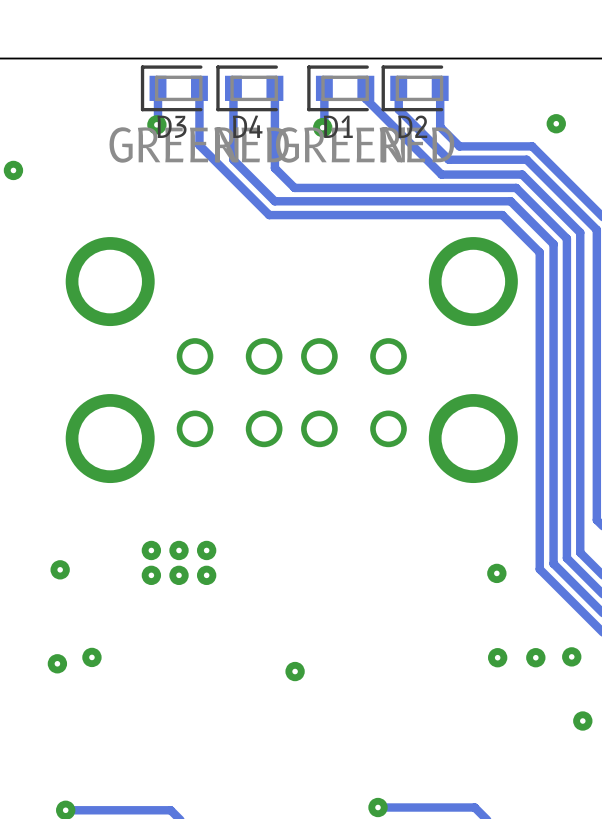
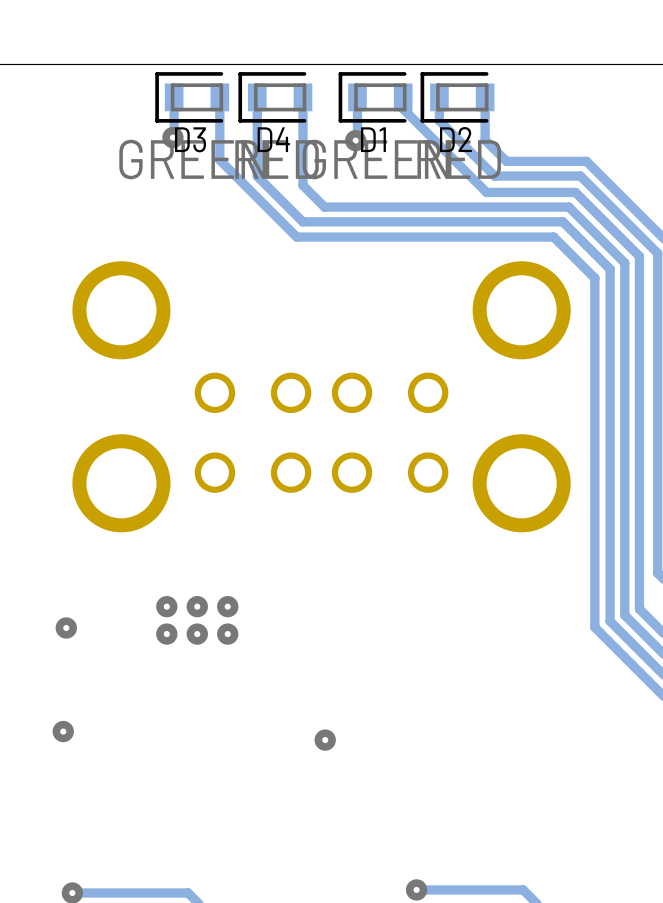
via: (556, 123) -> none
via: (13, 170) -> none
via: (496, 573) -> none
via: (571, 656) -> none
via: (91, 657) -> none
via: (497, 657) -> none
via: (535, 657) -> none
via: (582, 721) -> none

